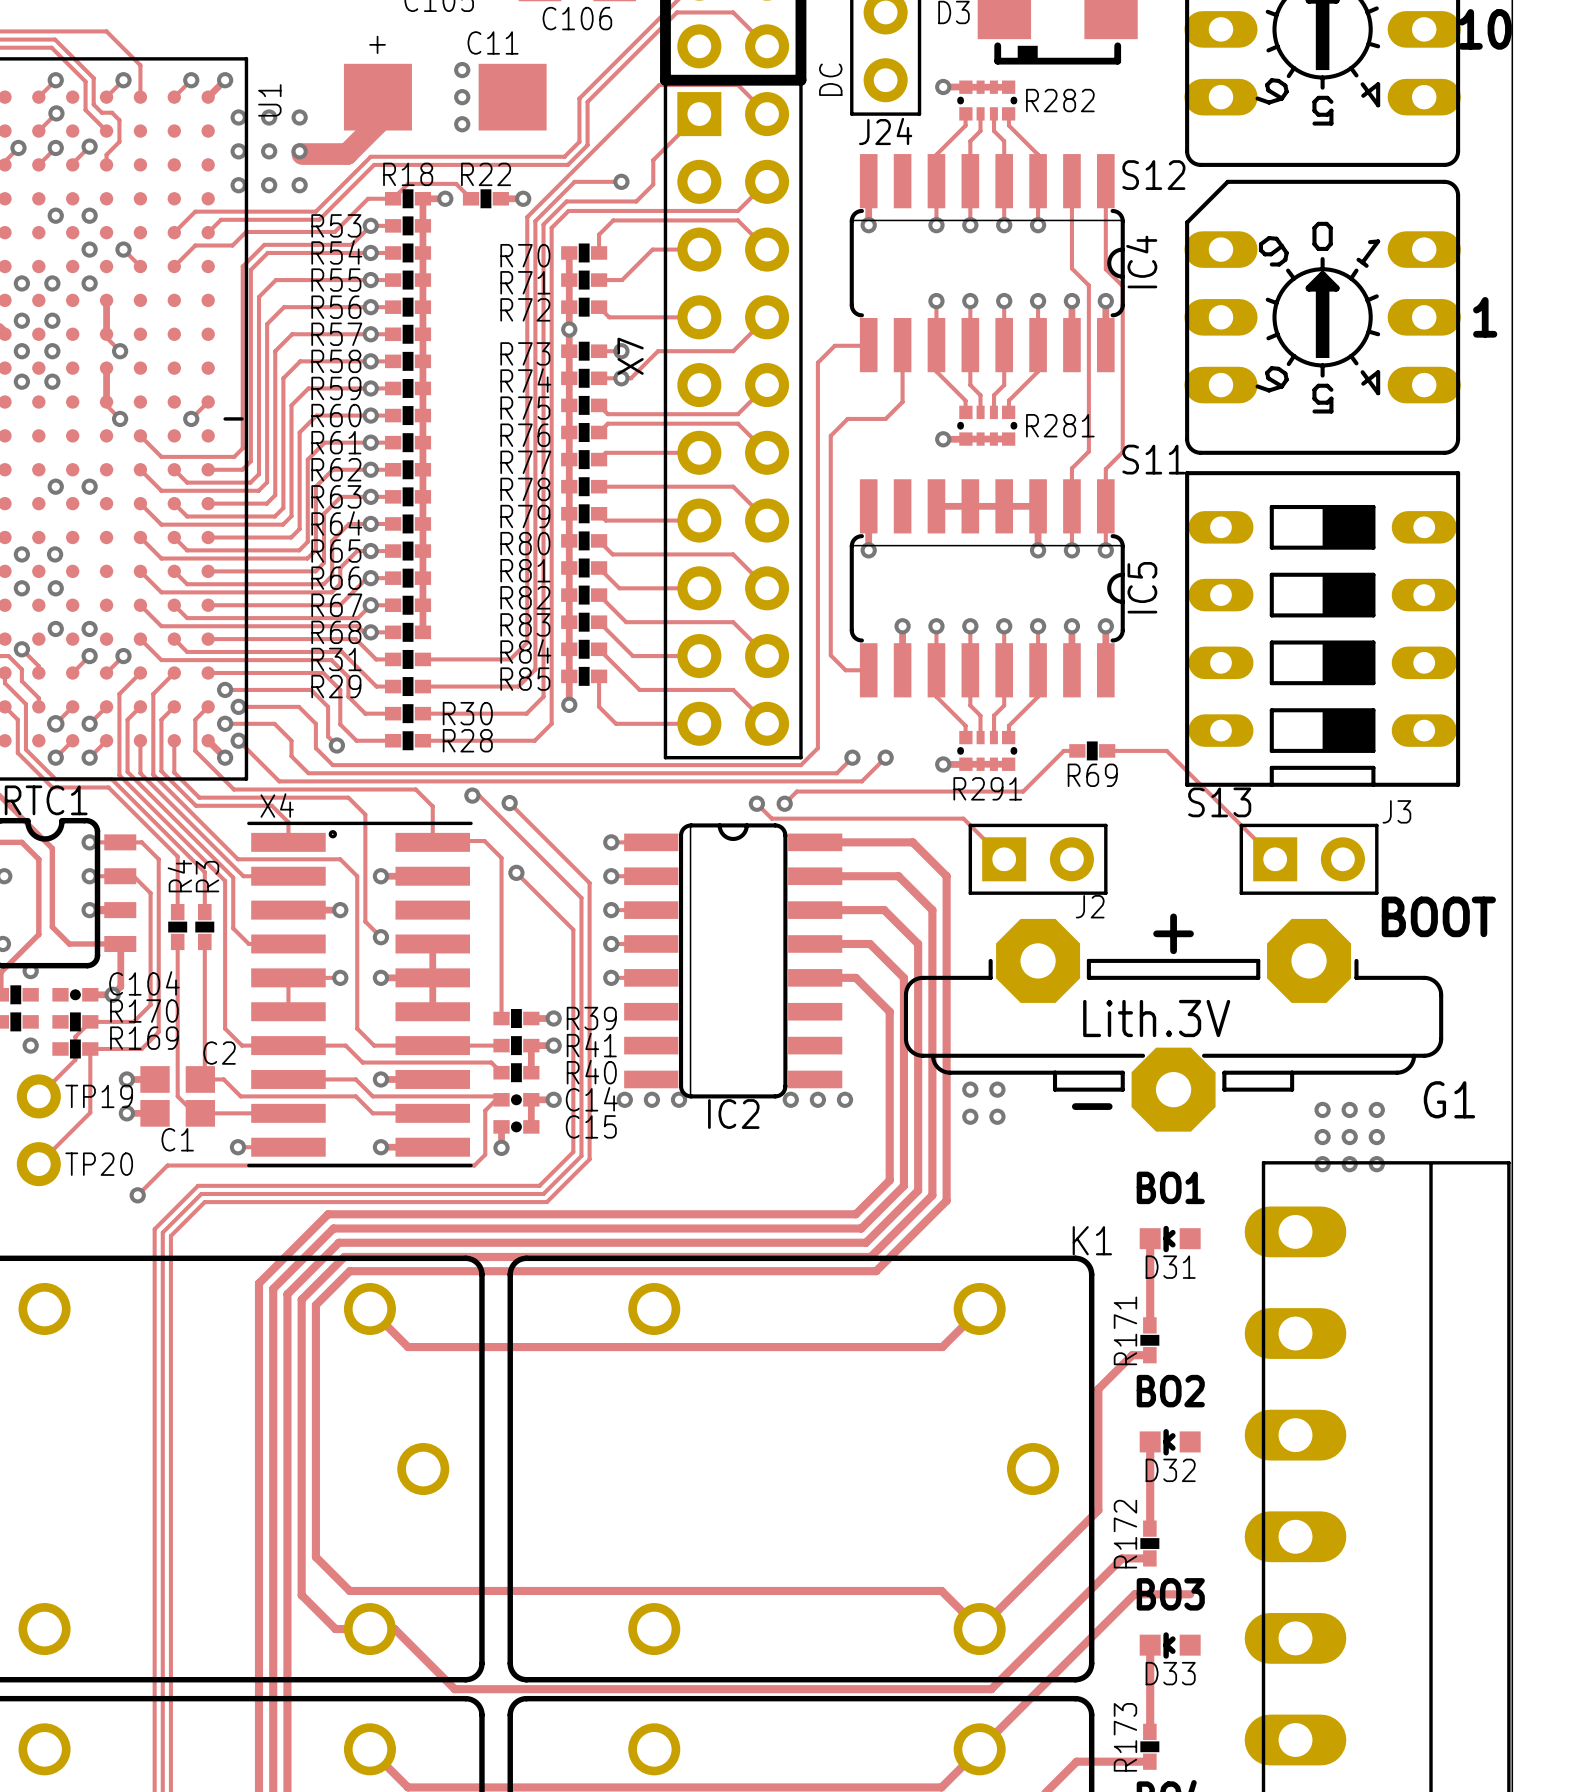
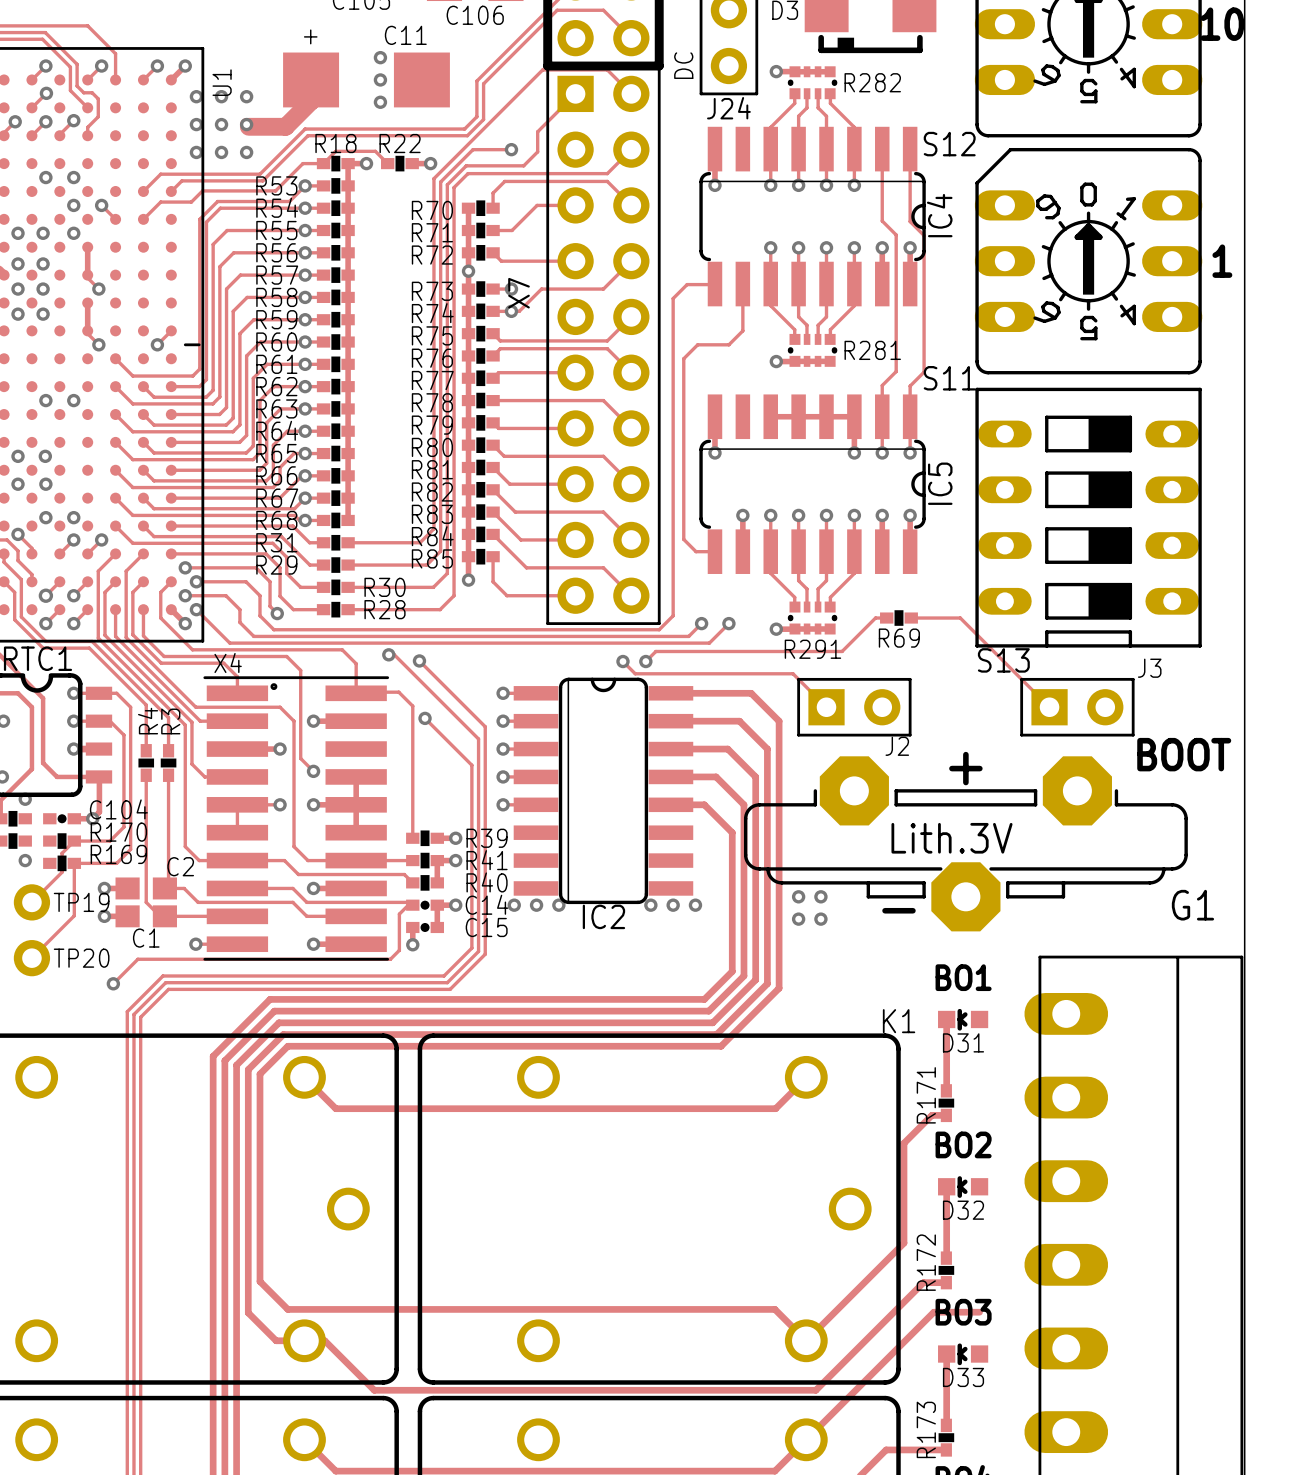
via: (1322, 1109) -> none
via: (1349, 1109) -> none
via: (1376, 1109) -> none
via: (1322, 1137) -> none
via: (1349, 1137) -> none
via: (1376, 1137) -> none
via: (1322, 1164) -> none
via: (1349, 1164) -> none
via: (1376, 1164) -> none

